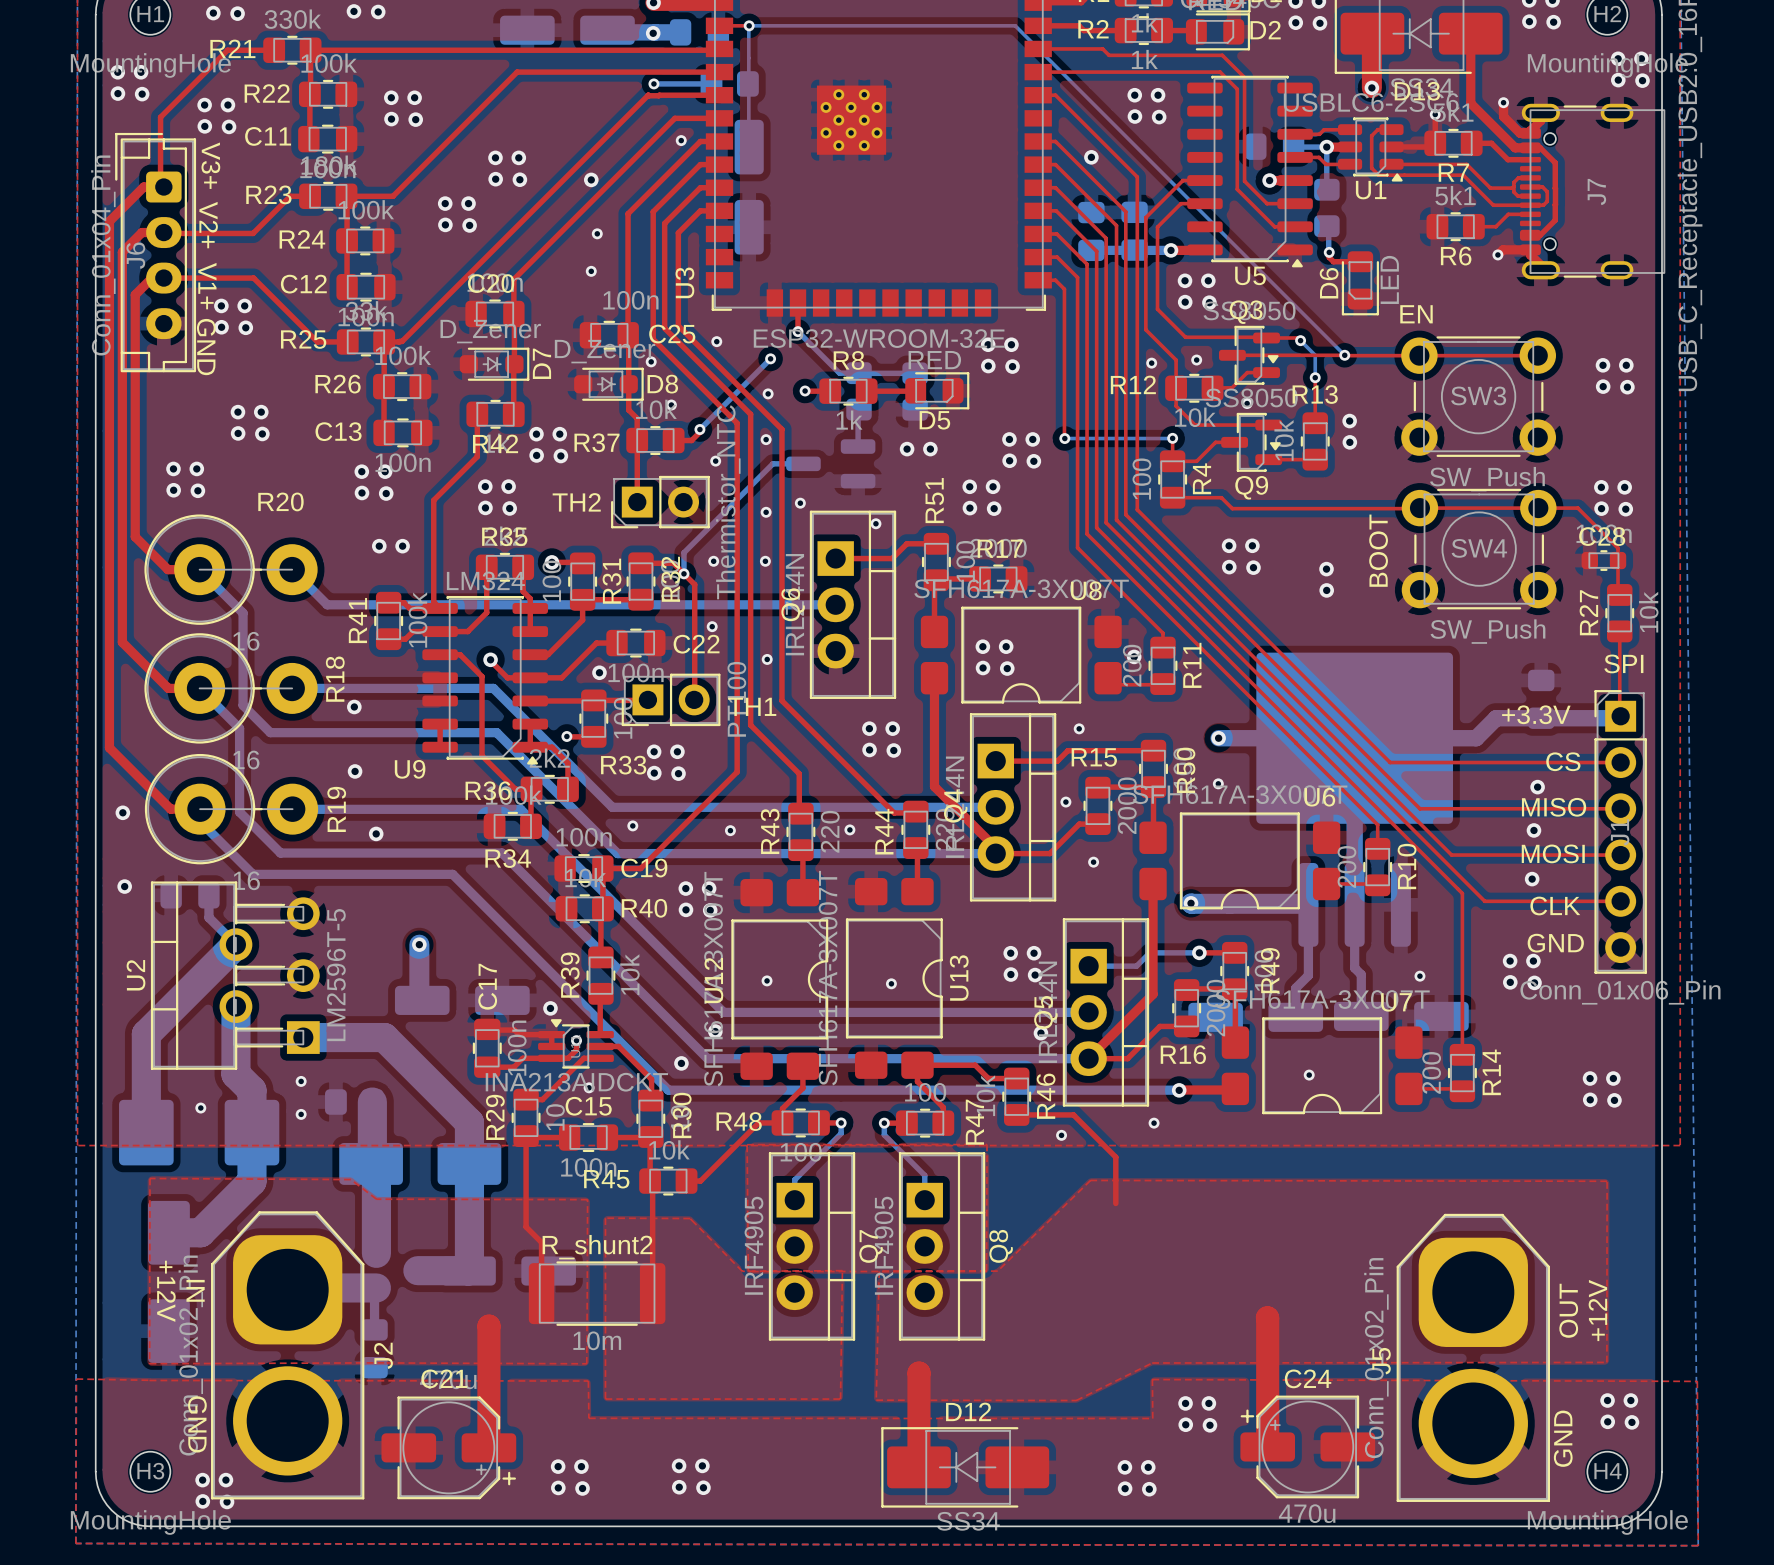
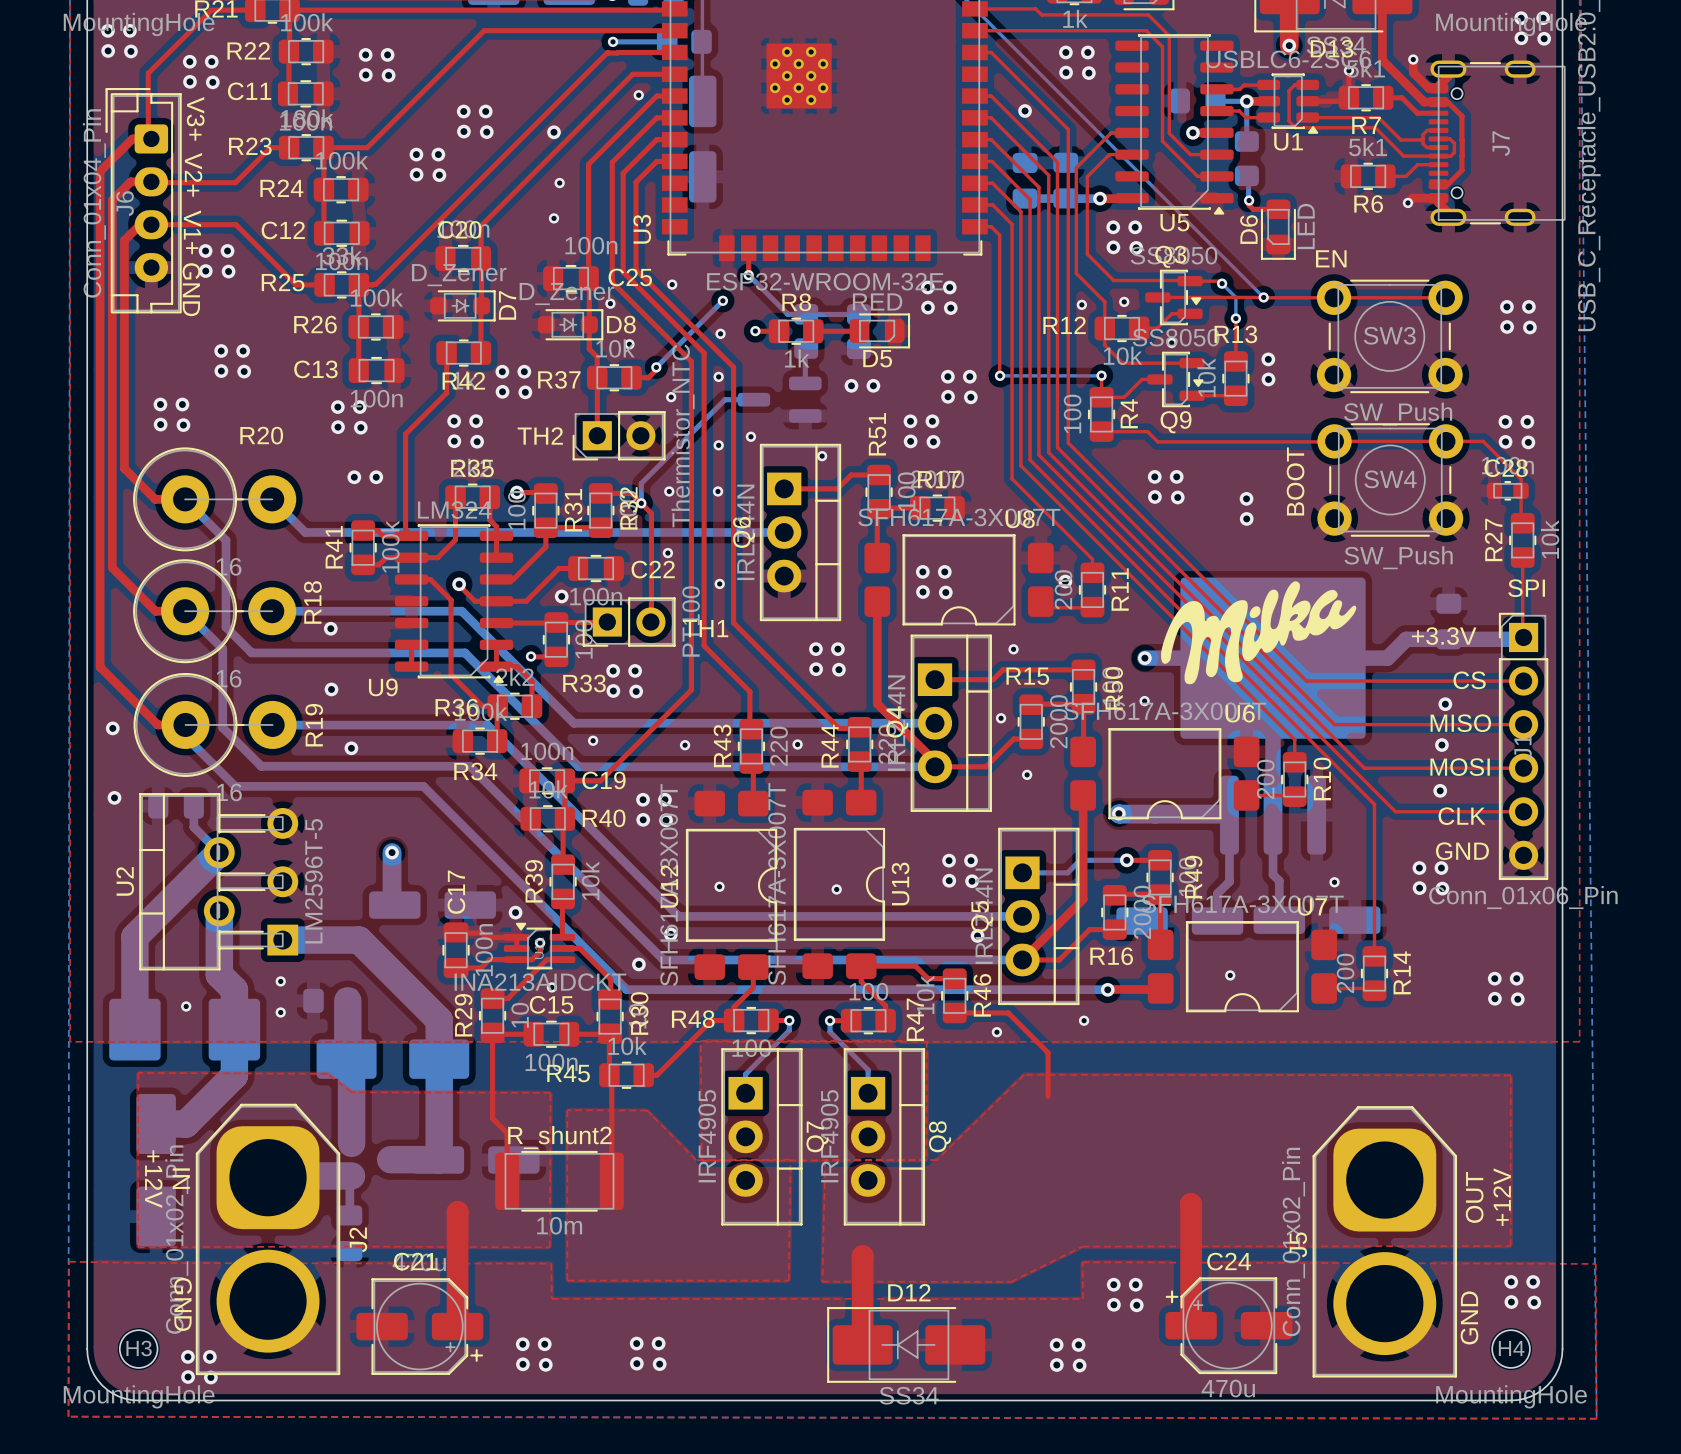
drawing: none -> [1161, 581, 1357, 685]

